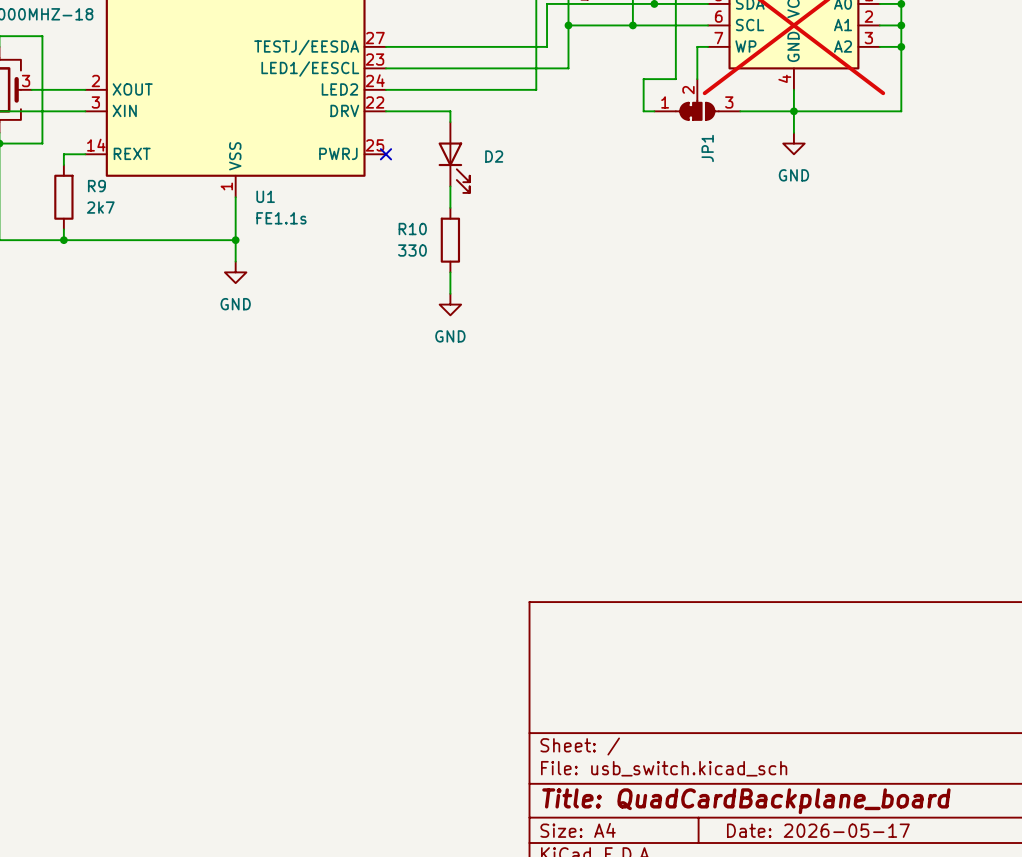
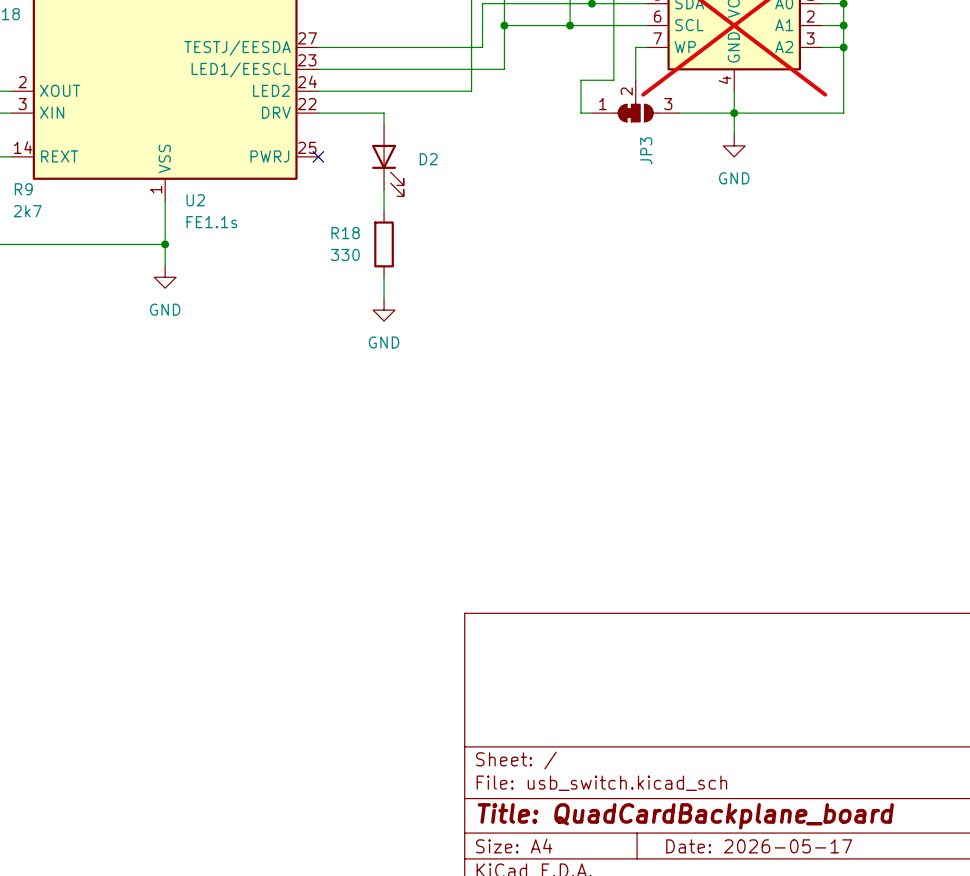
JP1 name: JP1 (707, 148) -> JP3 (646, 150)
U1 name: U1 (265, 196) -> U2 (195, 200)
R10 name: R10 (412, 229) -> R18 (345, 233)

